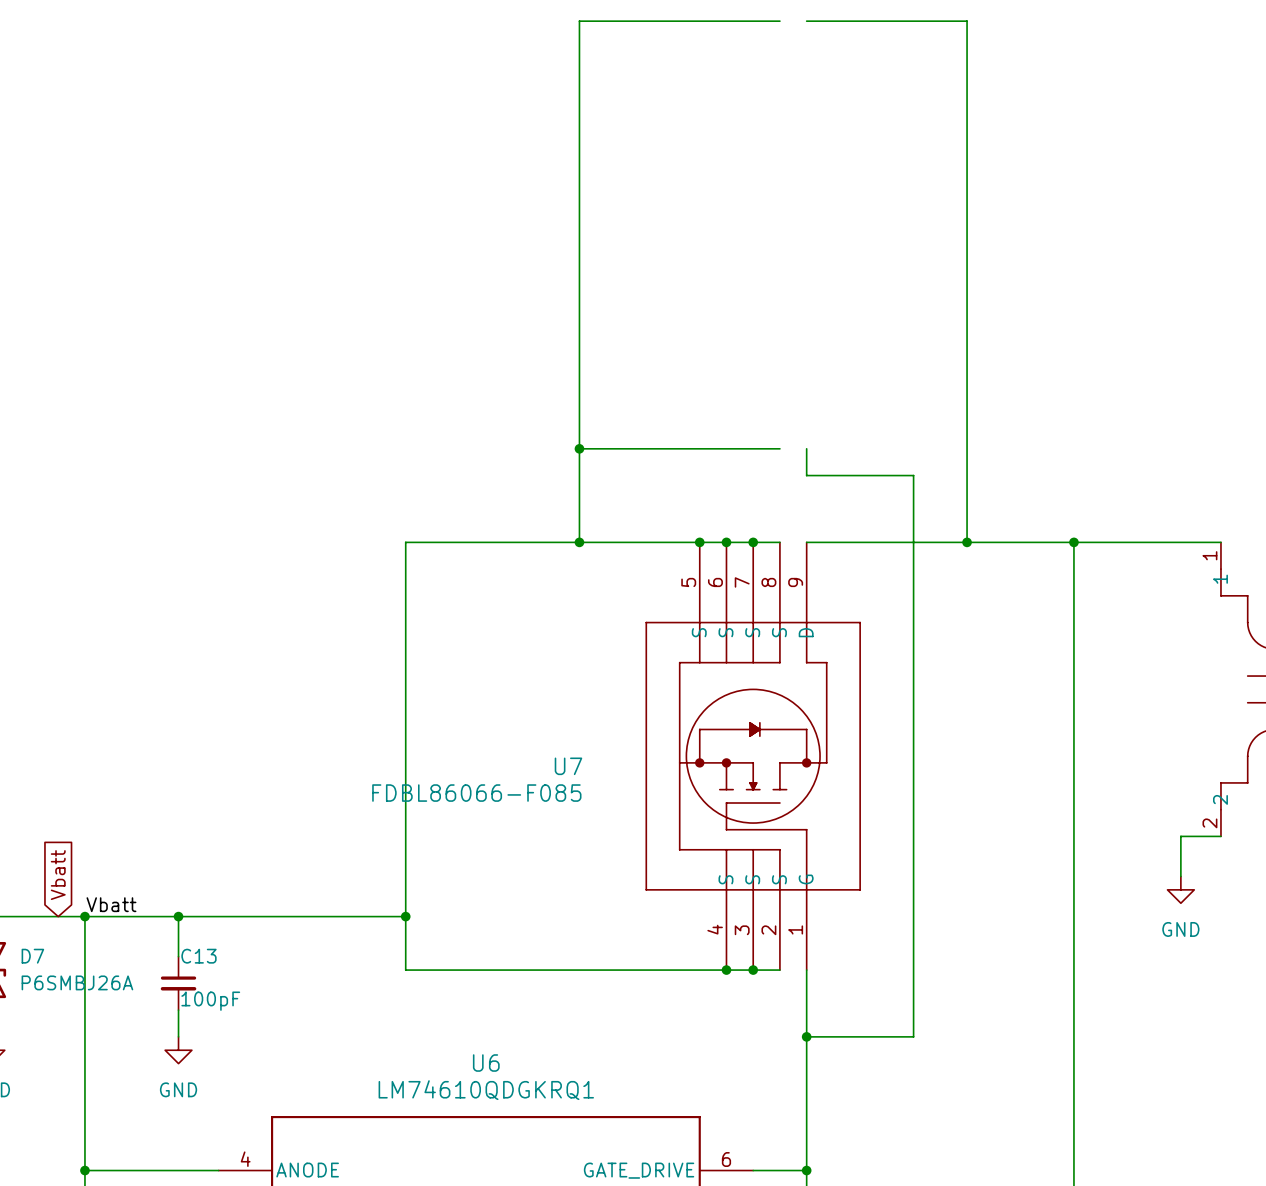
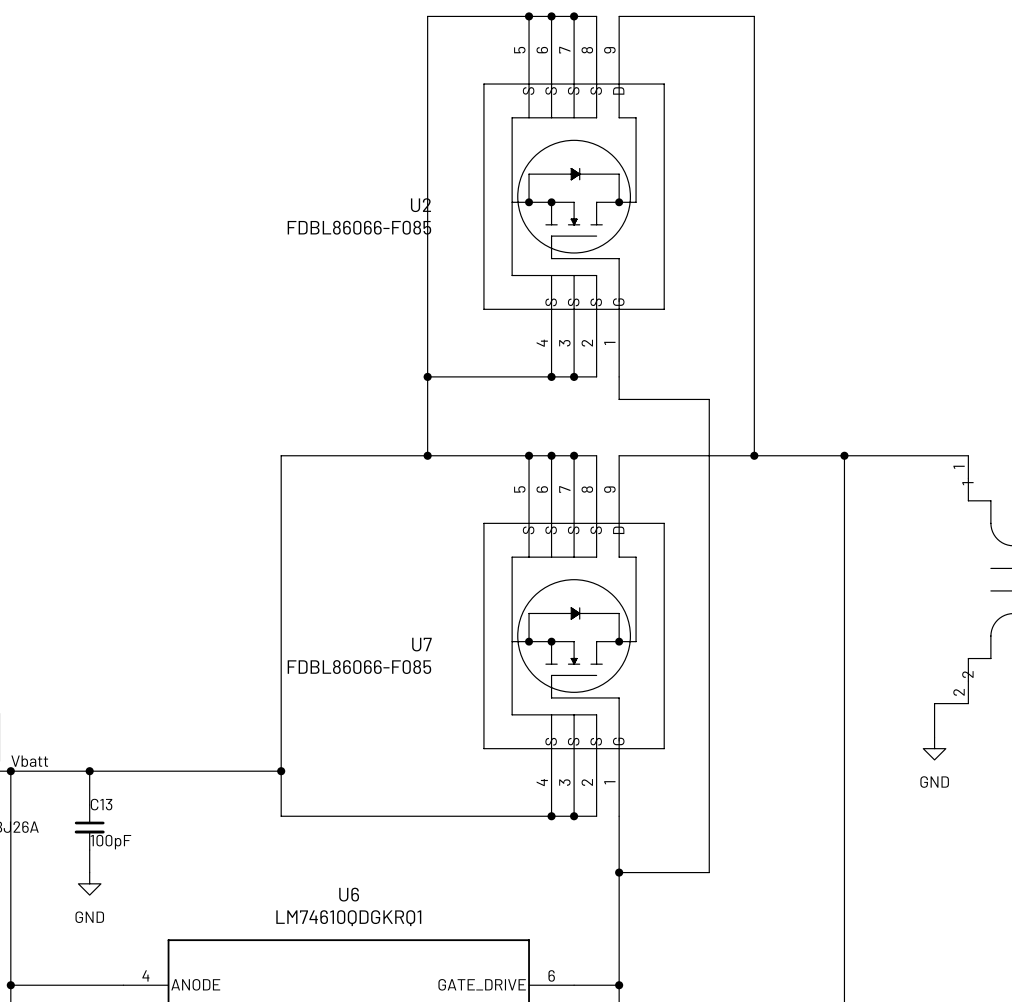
junction: none -> (529, 16)
junction: none -> (551, 16)
junction: none -> (574, 16)
U2: none -> FDBL86066-F085 (574, 196)
junction: none -> (551, 376)
junction: none -> (574, 376)

